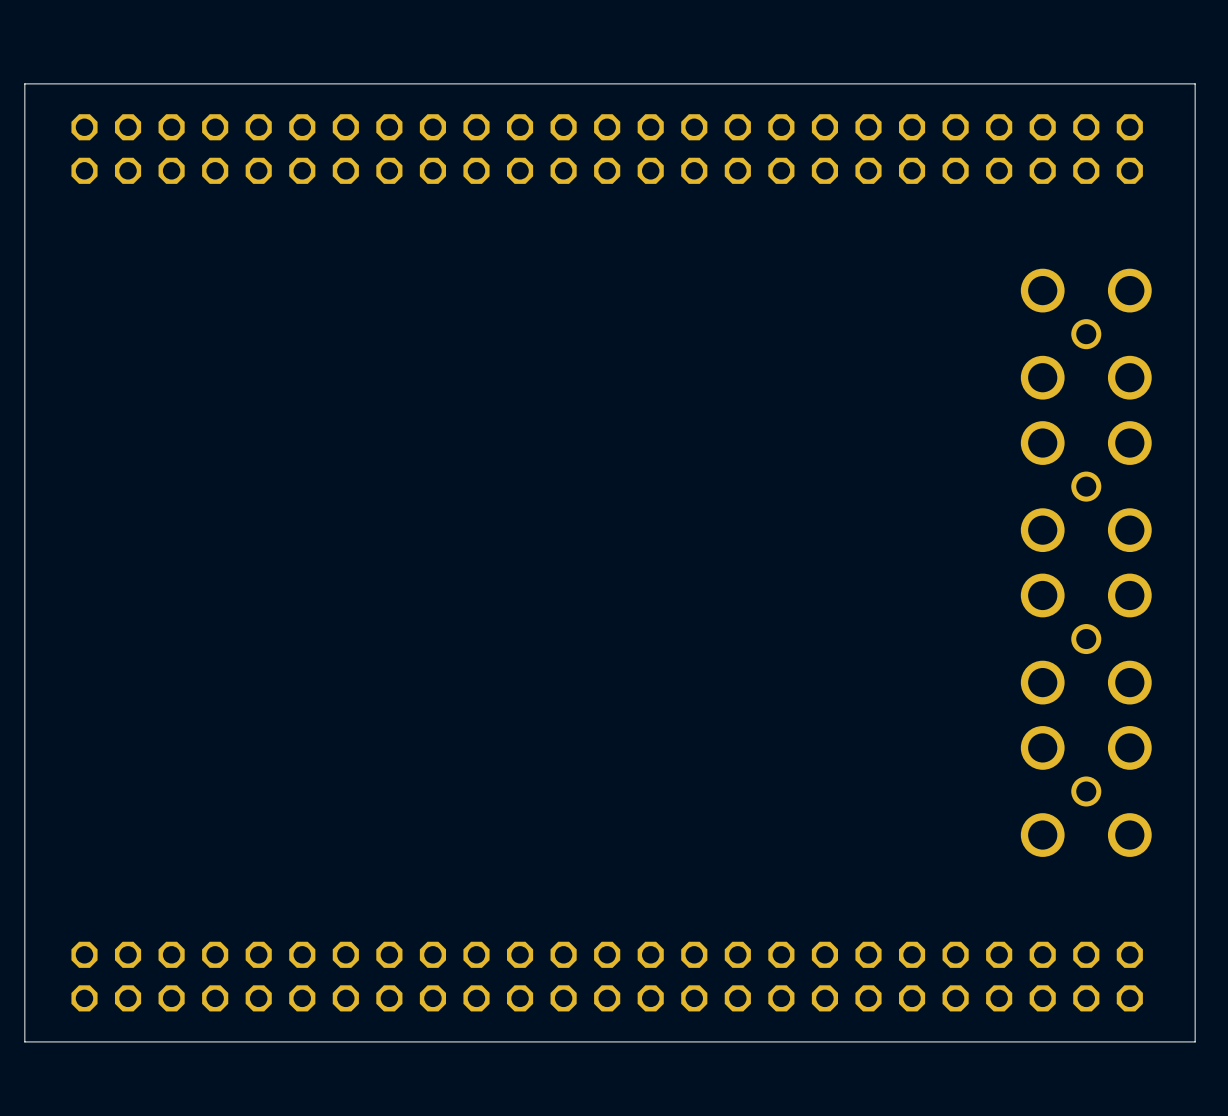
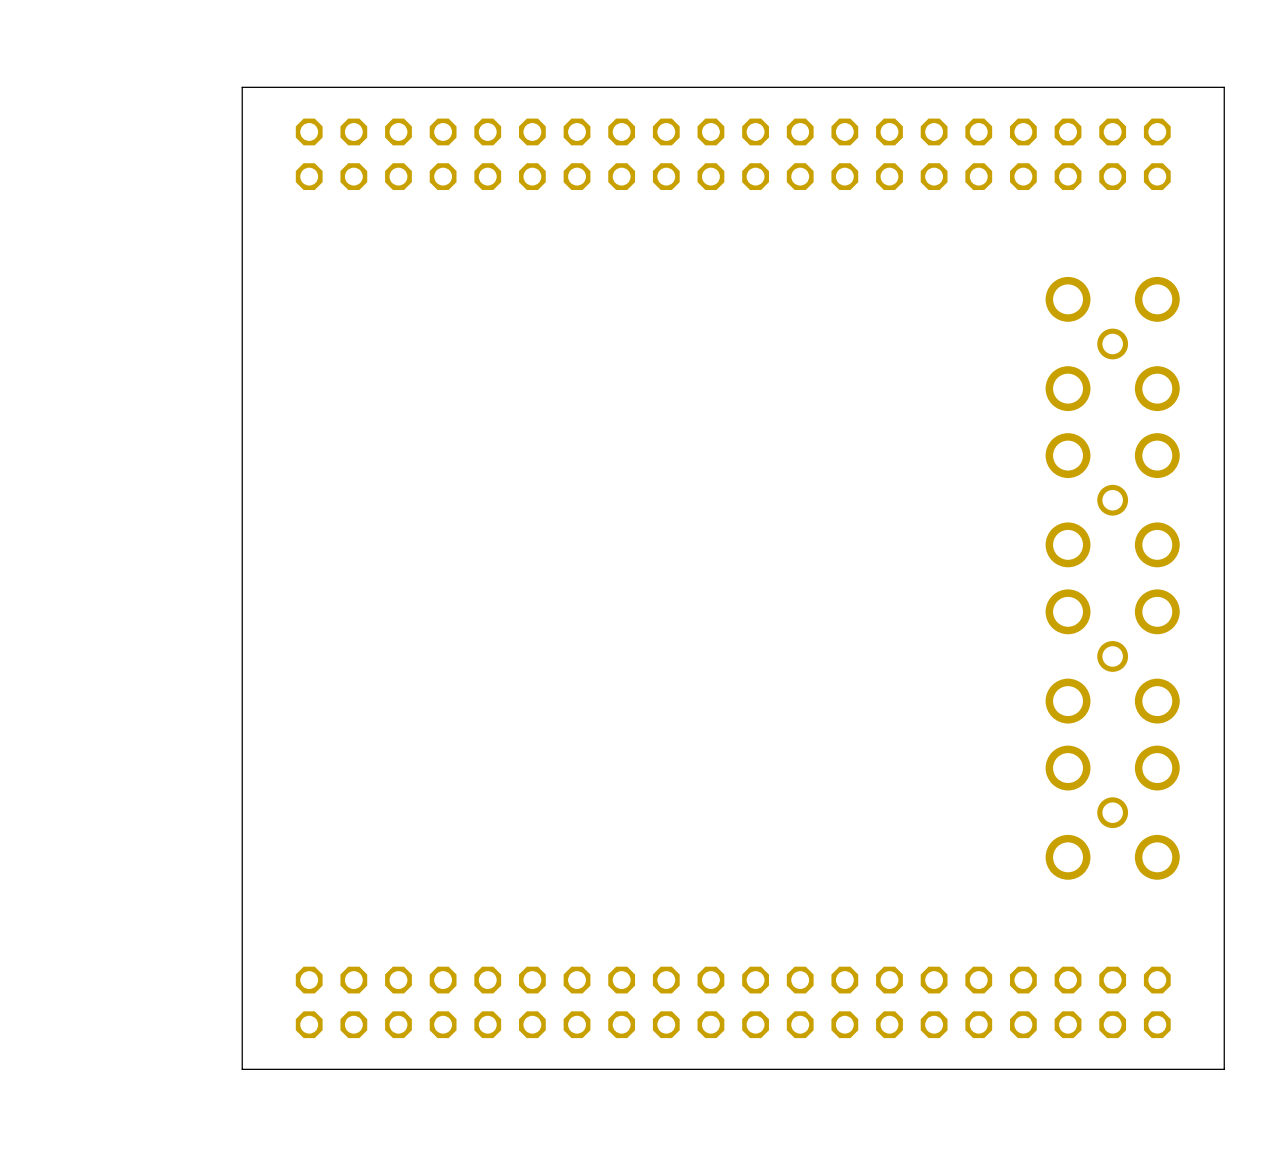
board edge: (1195, 83) (24, 83) (24, 1041) (236, 1041) -> (1224, 87) (242, 87) (242, 1069)
part: (607, 149) -> none
part: (607, 976) -> none

